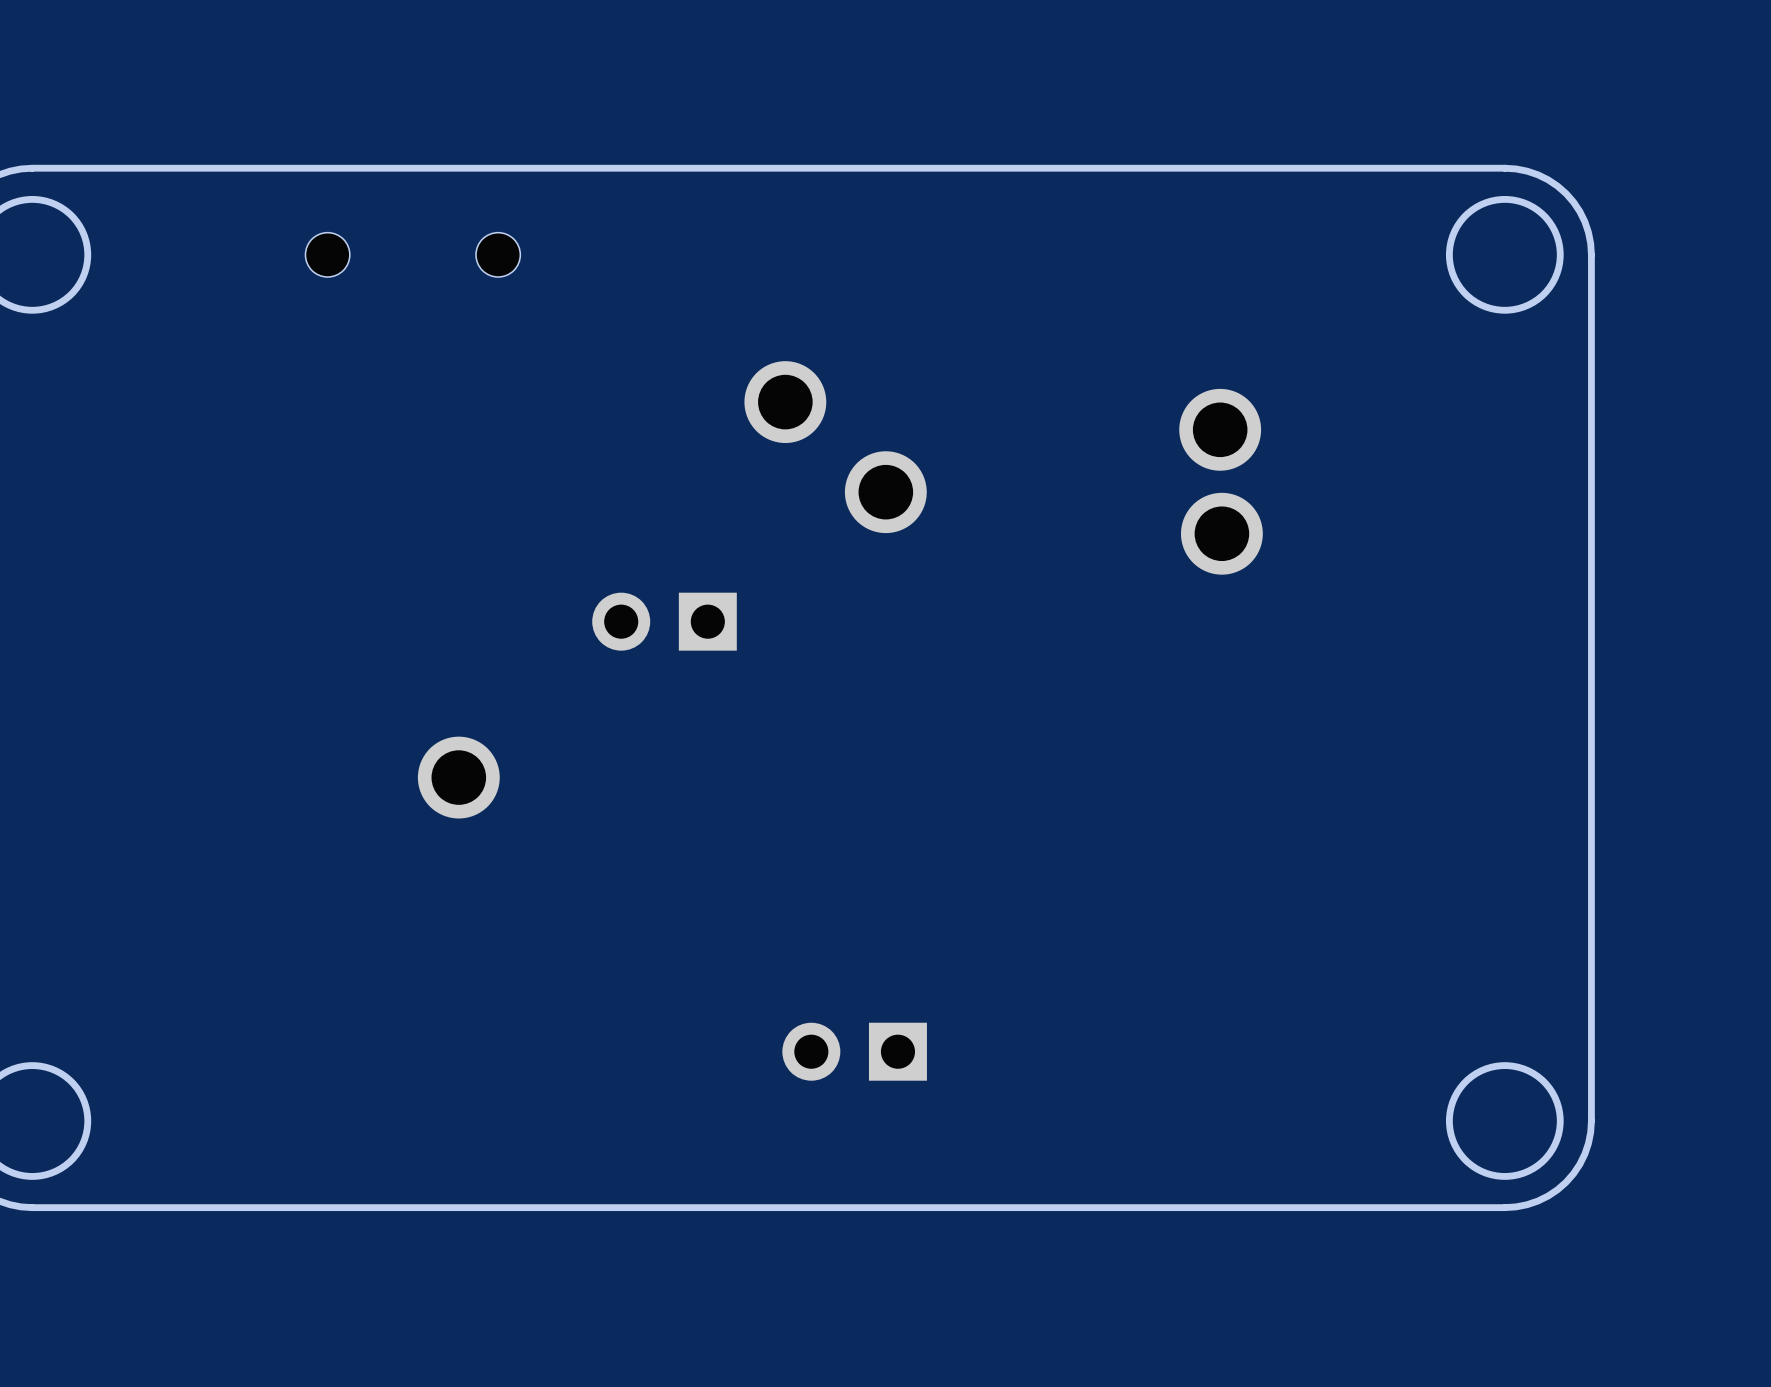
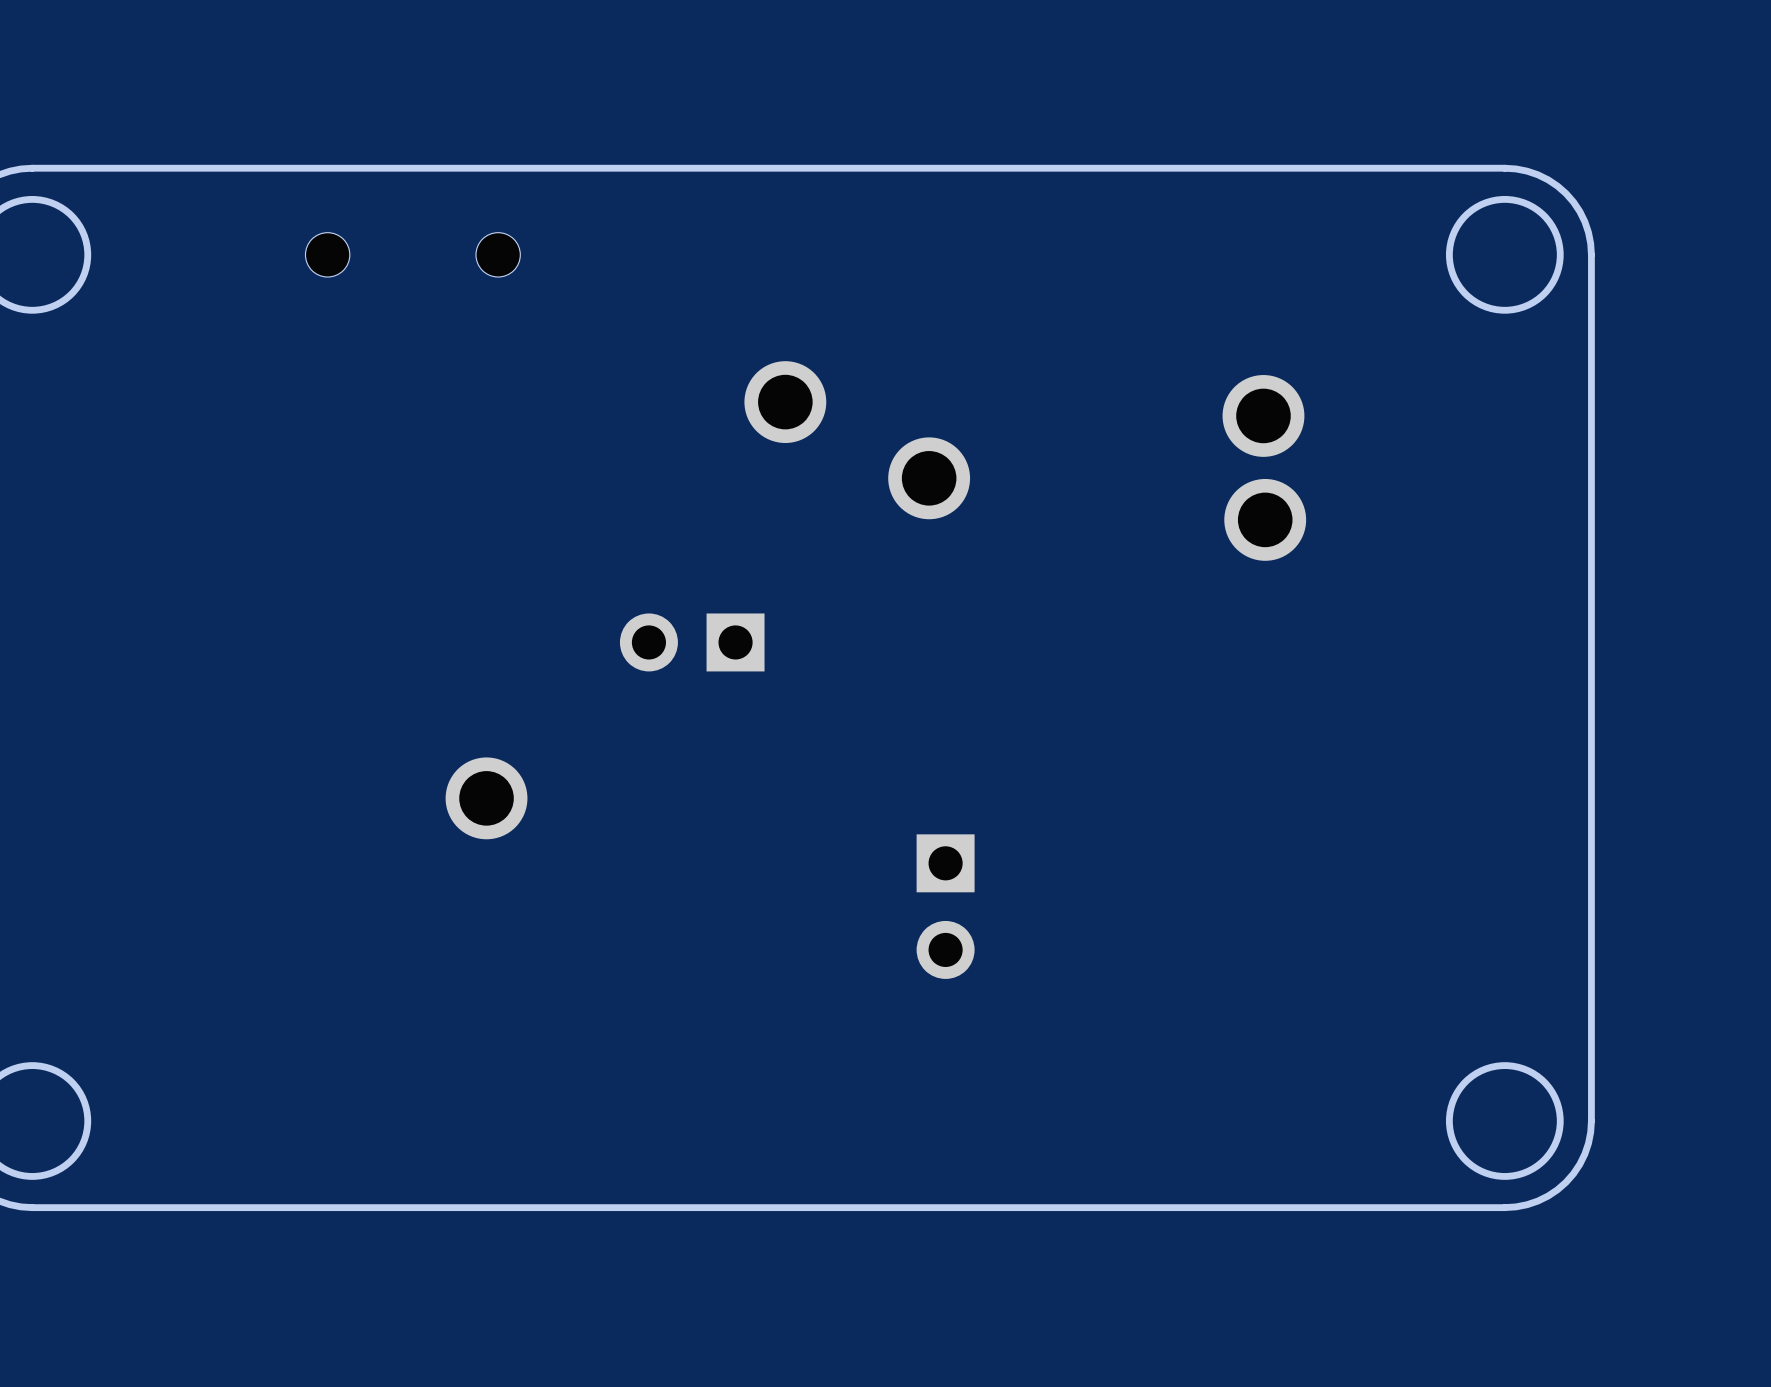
part position: (1220, 429) -> (1263, 415)
part position: (885, 492) -> (929, 478)
part position: (1221, 533) -> (1265, 519)
part position: (664, 621) -> (692, 642)
part position: (458, 777) -> (486, 798)
part rotation: 0° (854, 1051) -> 90° counterclockwise (945, 906)
part position: (854, 1051) -> (945, 906)

